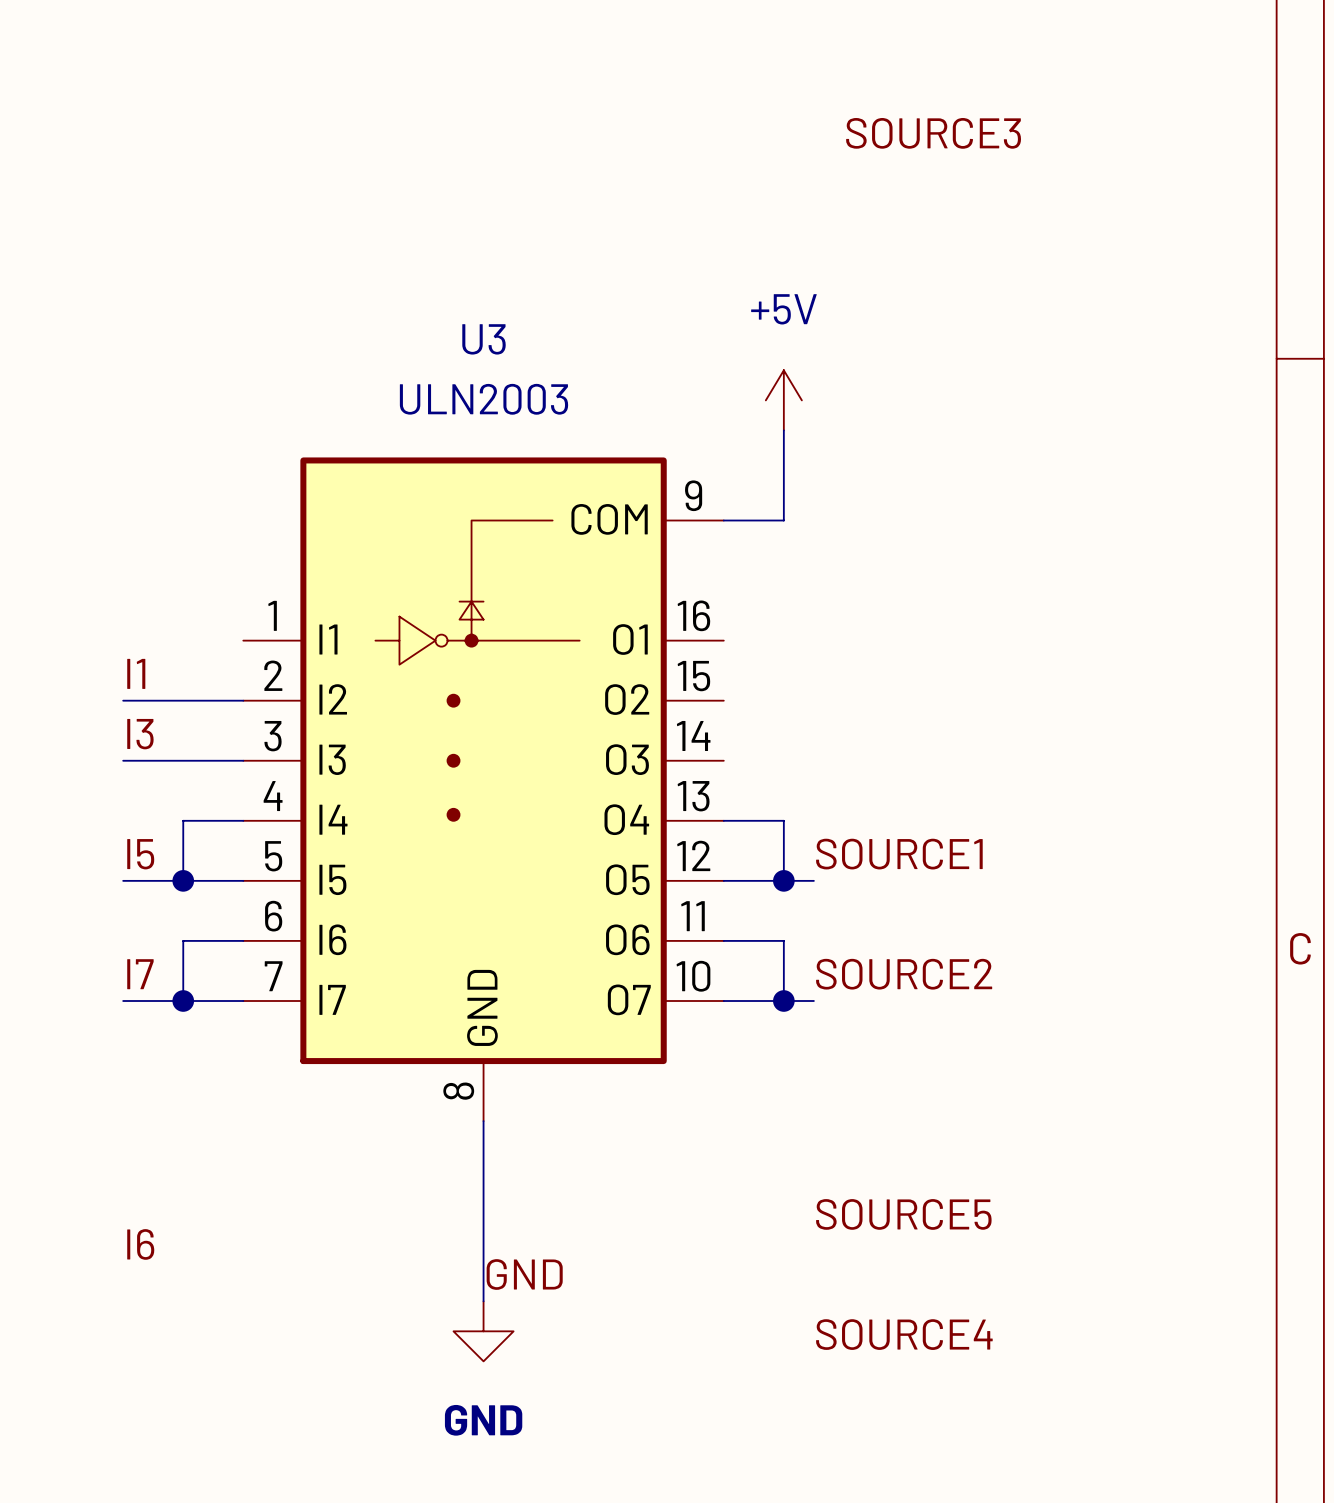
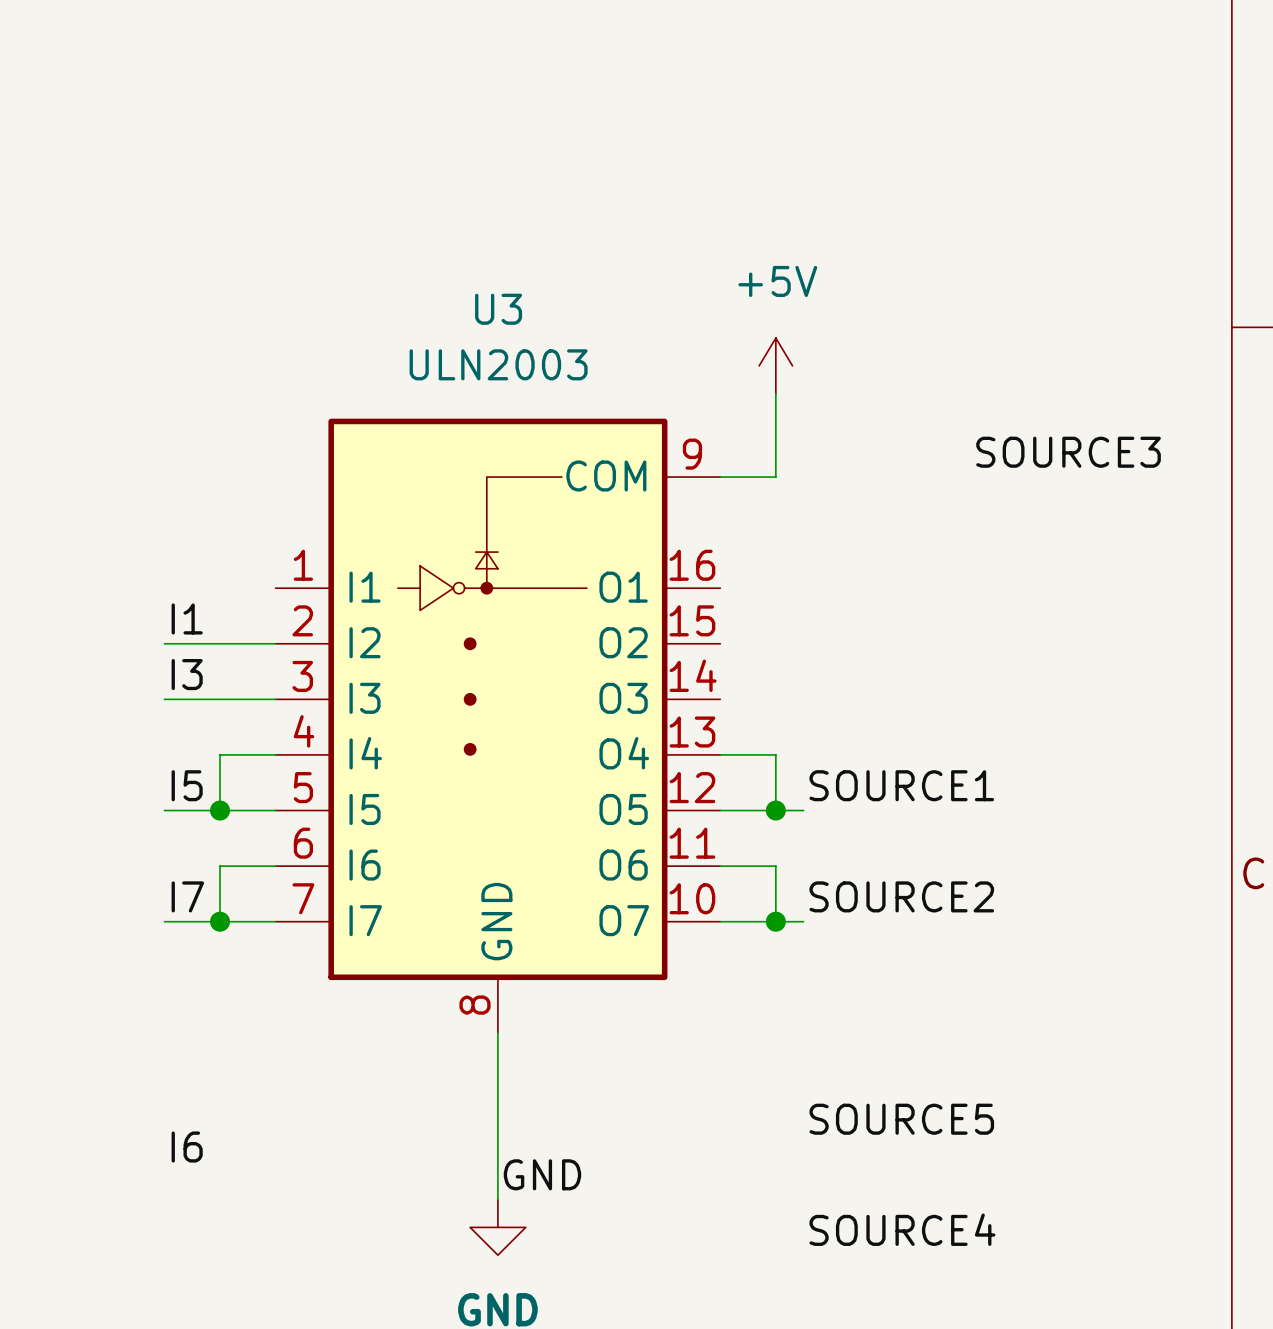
label position: SOURCE3 (933, 133) -> SOURCE3 (1068, 452)

